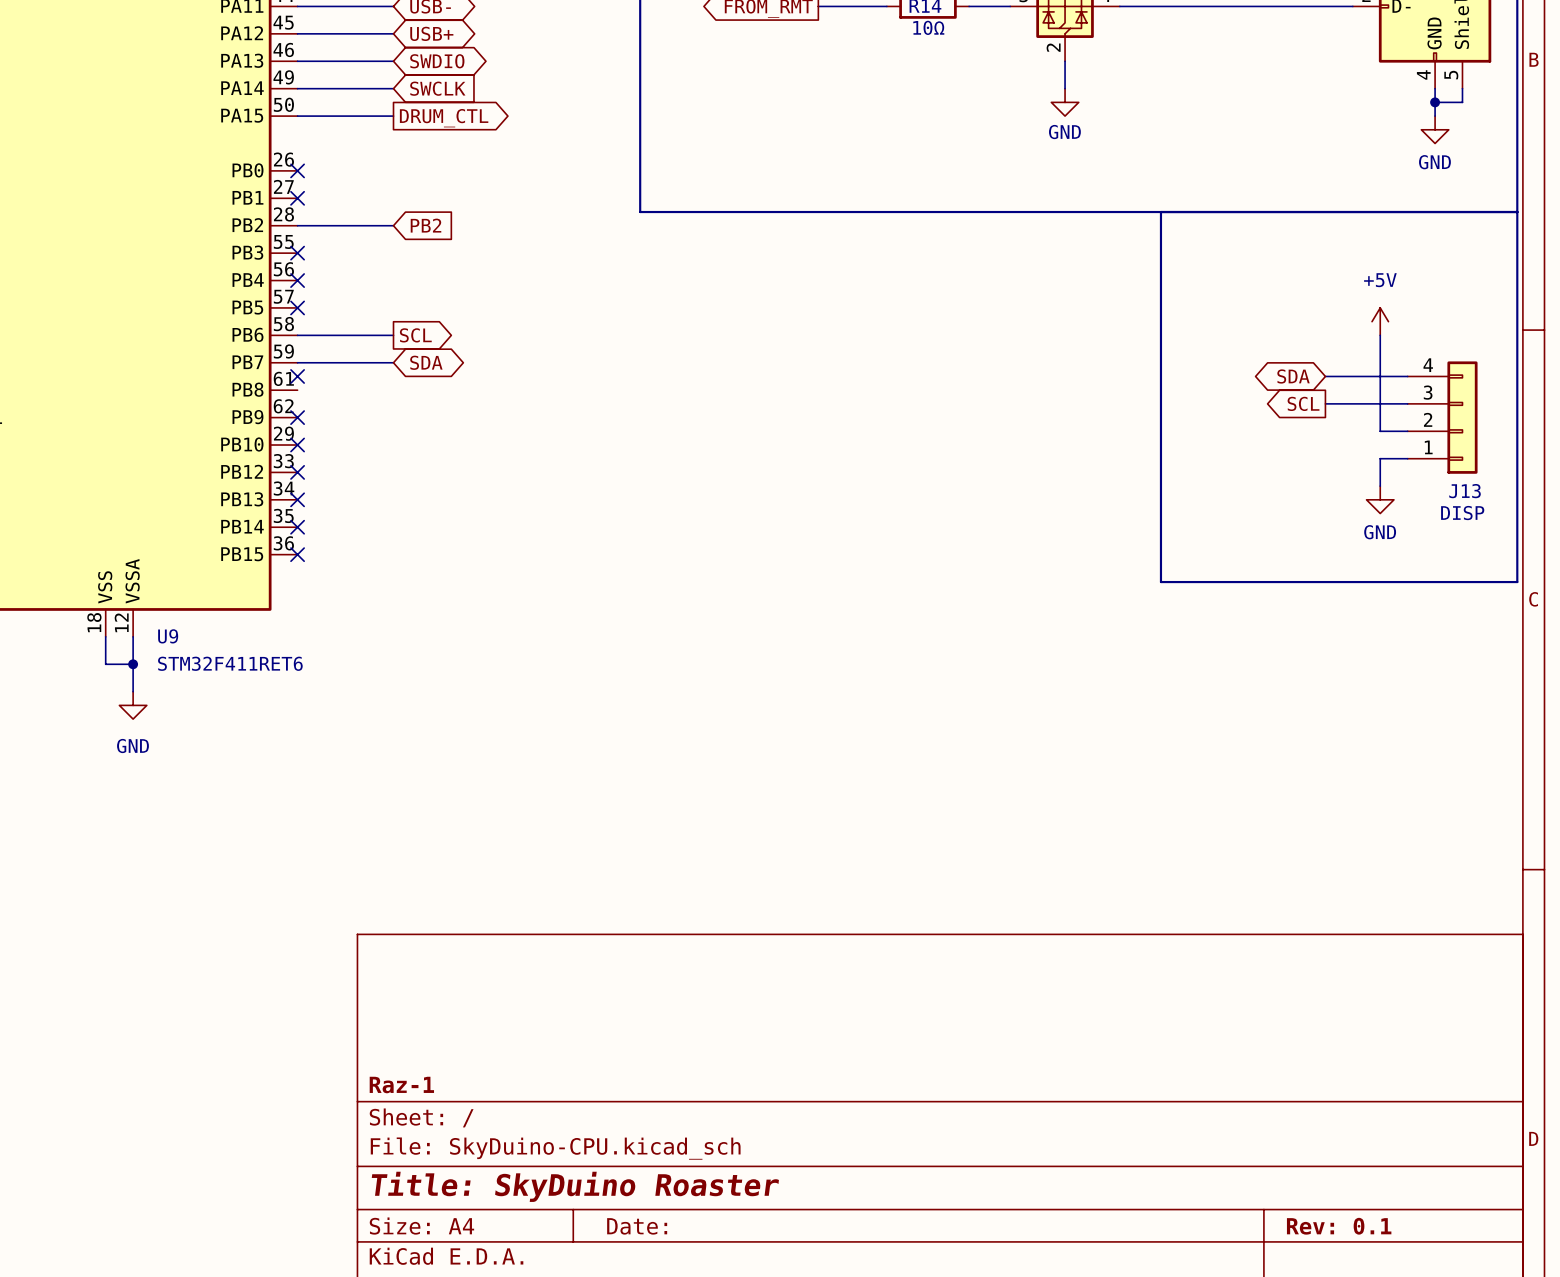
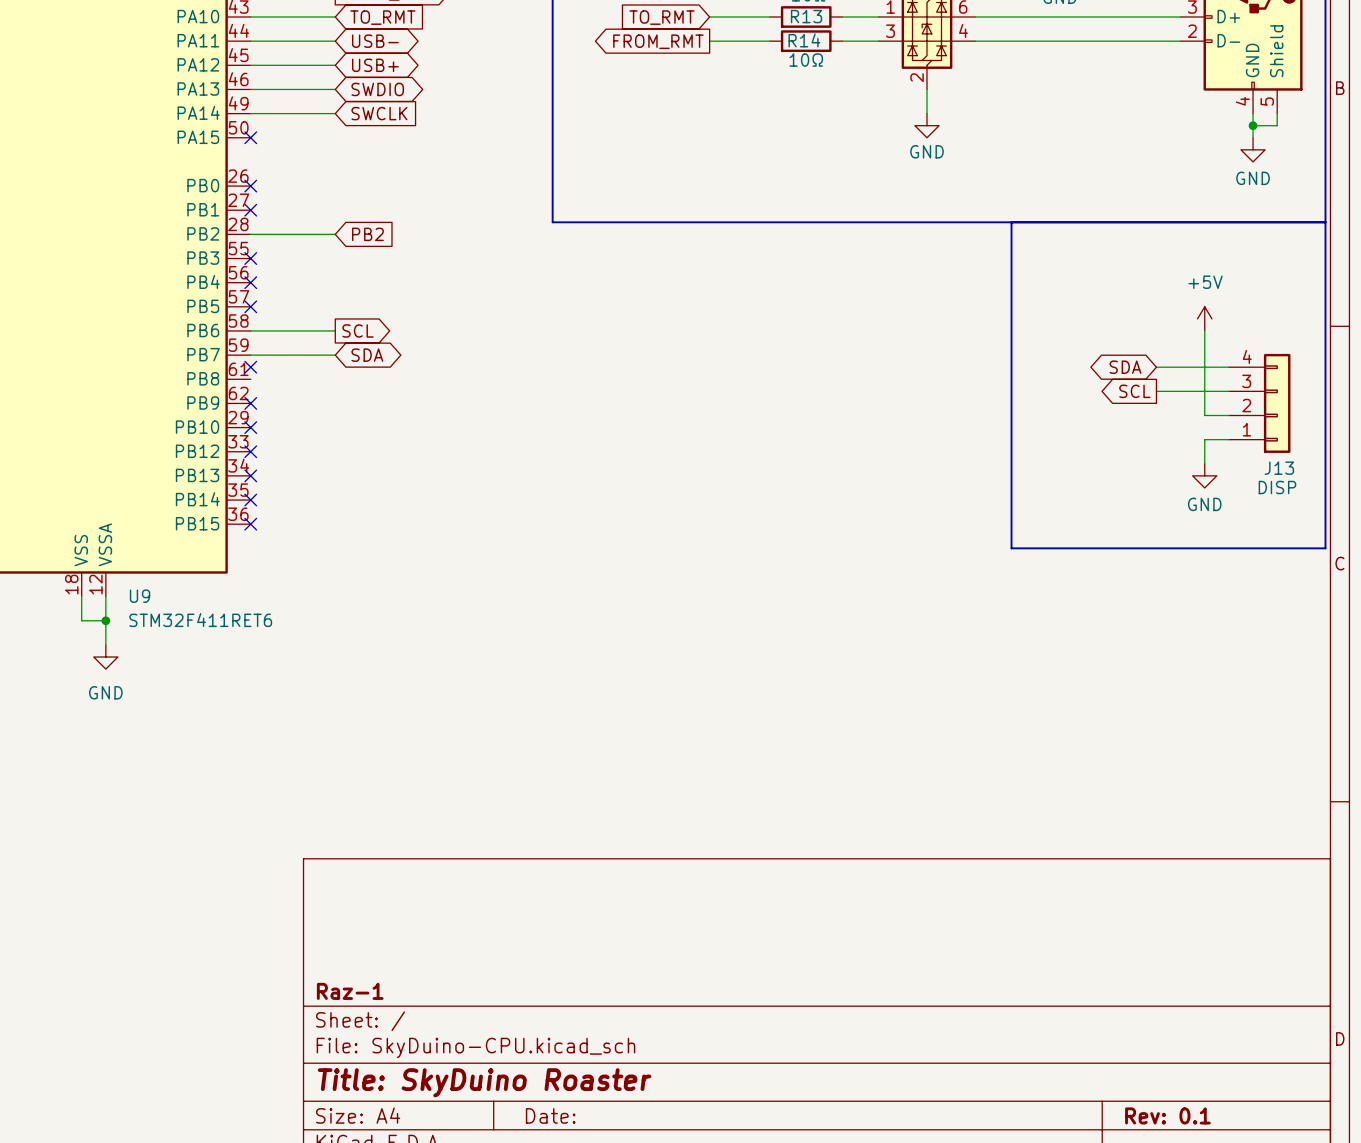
wire: (297, 116) (393, 116) -> none
no-connect mark: none -> (250, 137)
global label: DRUM_CTL (444, 118) -> none

